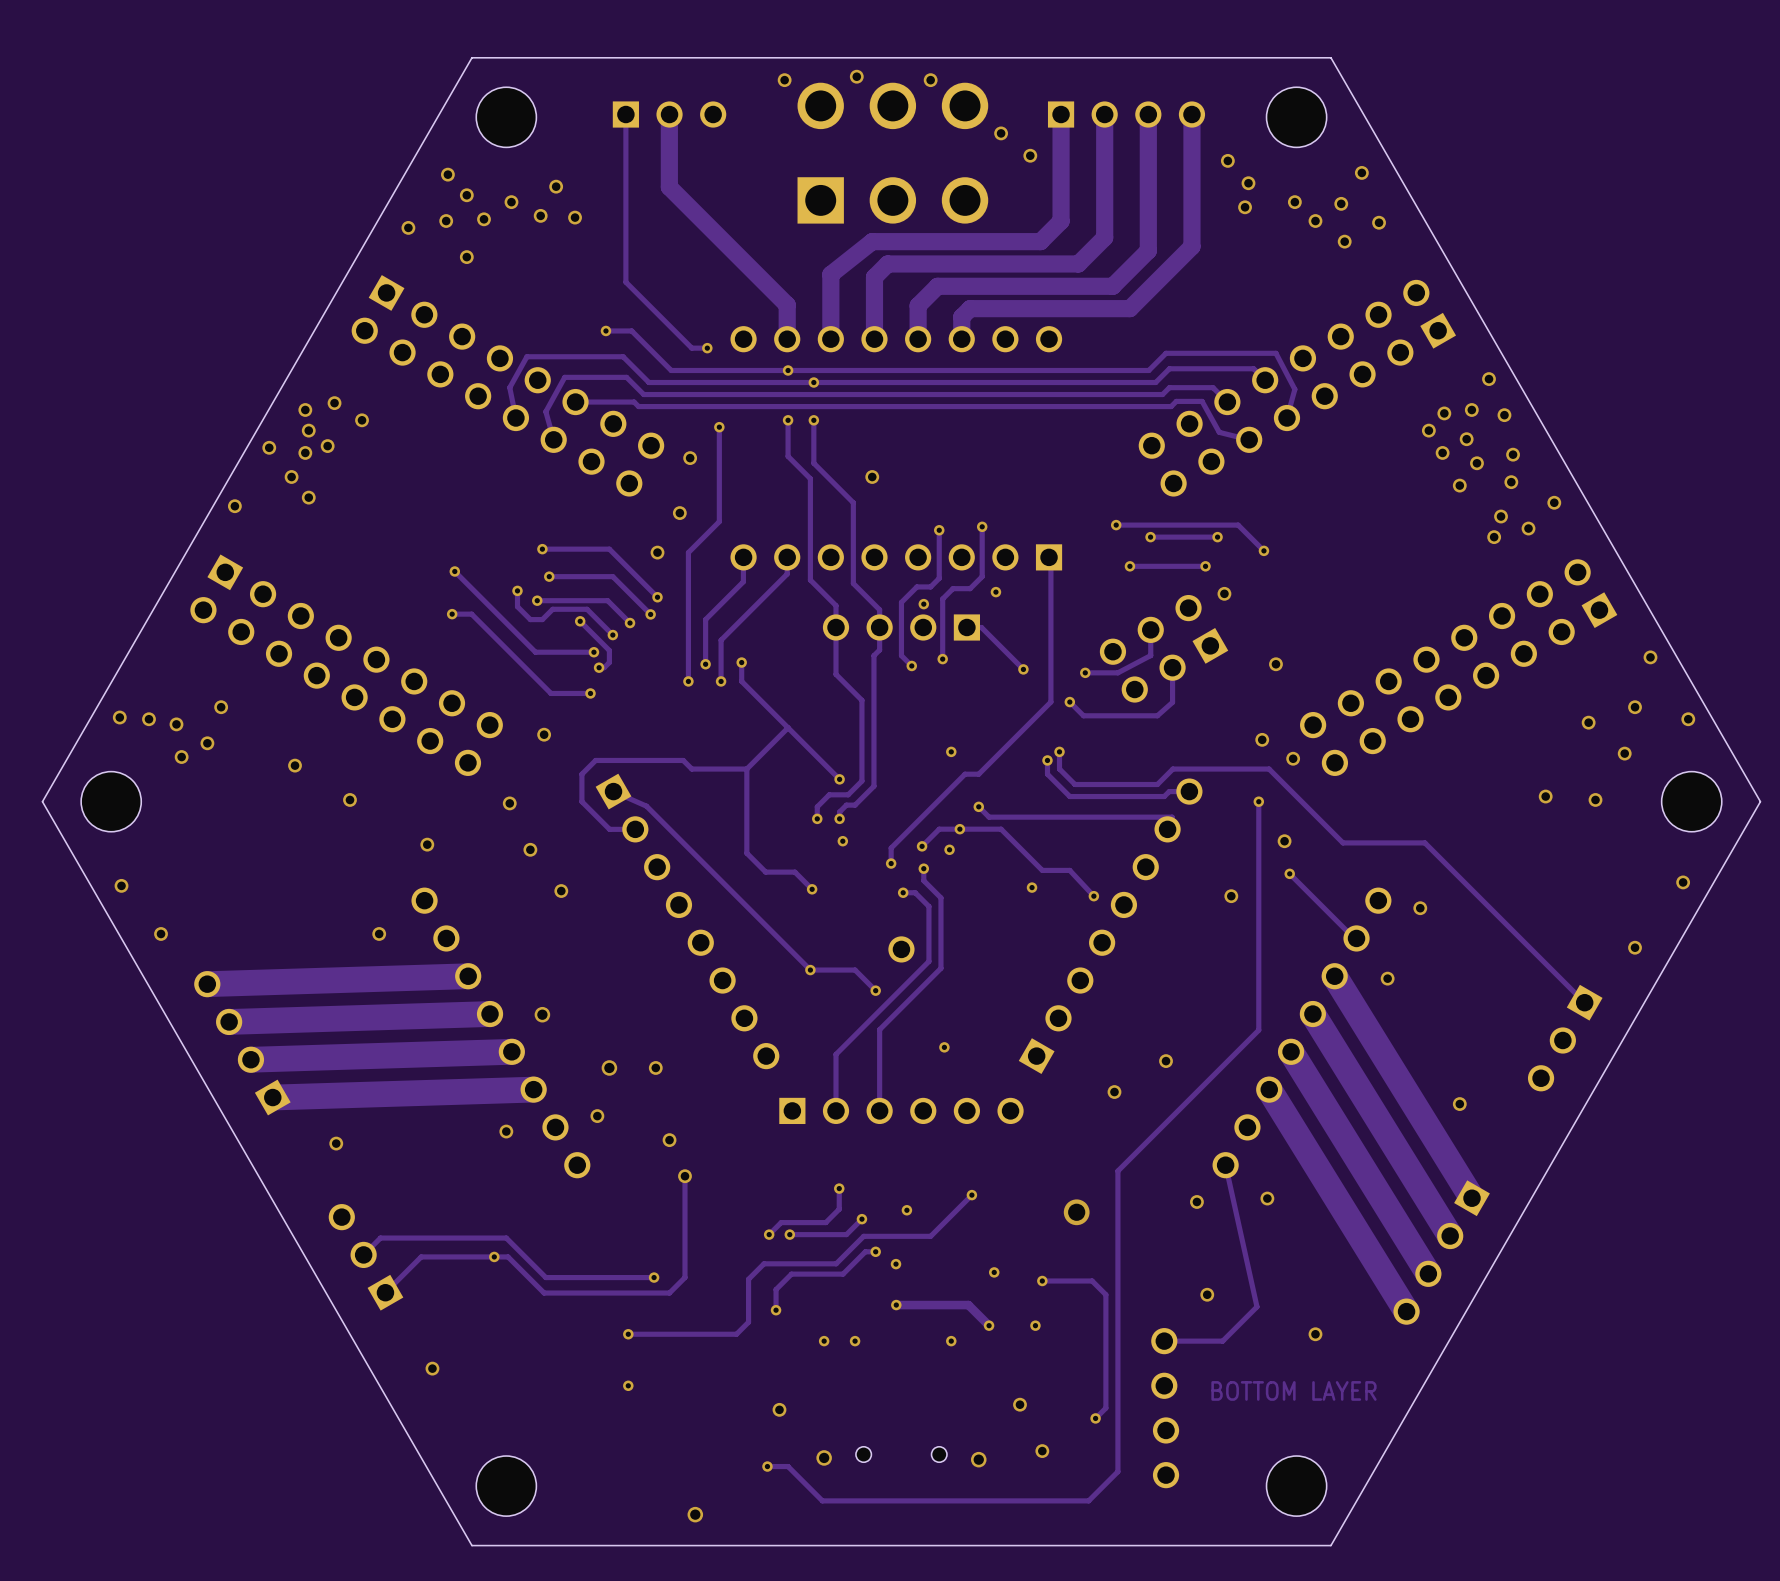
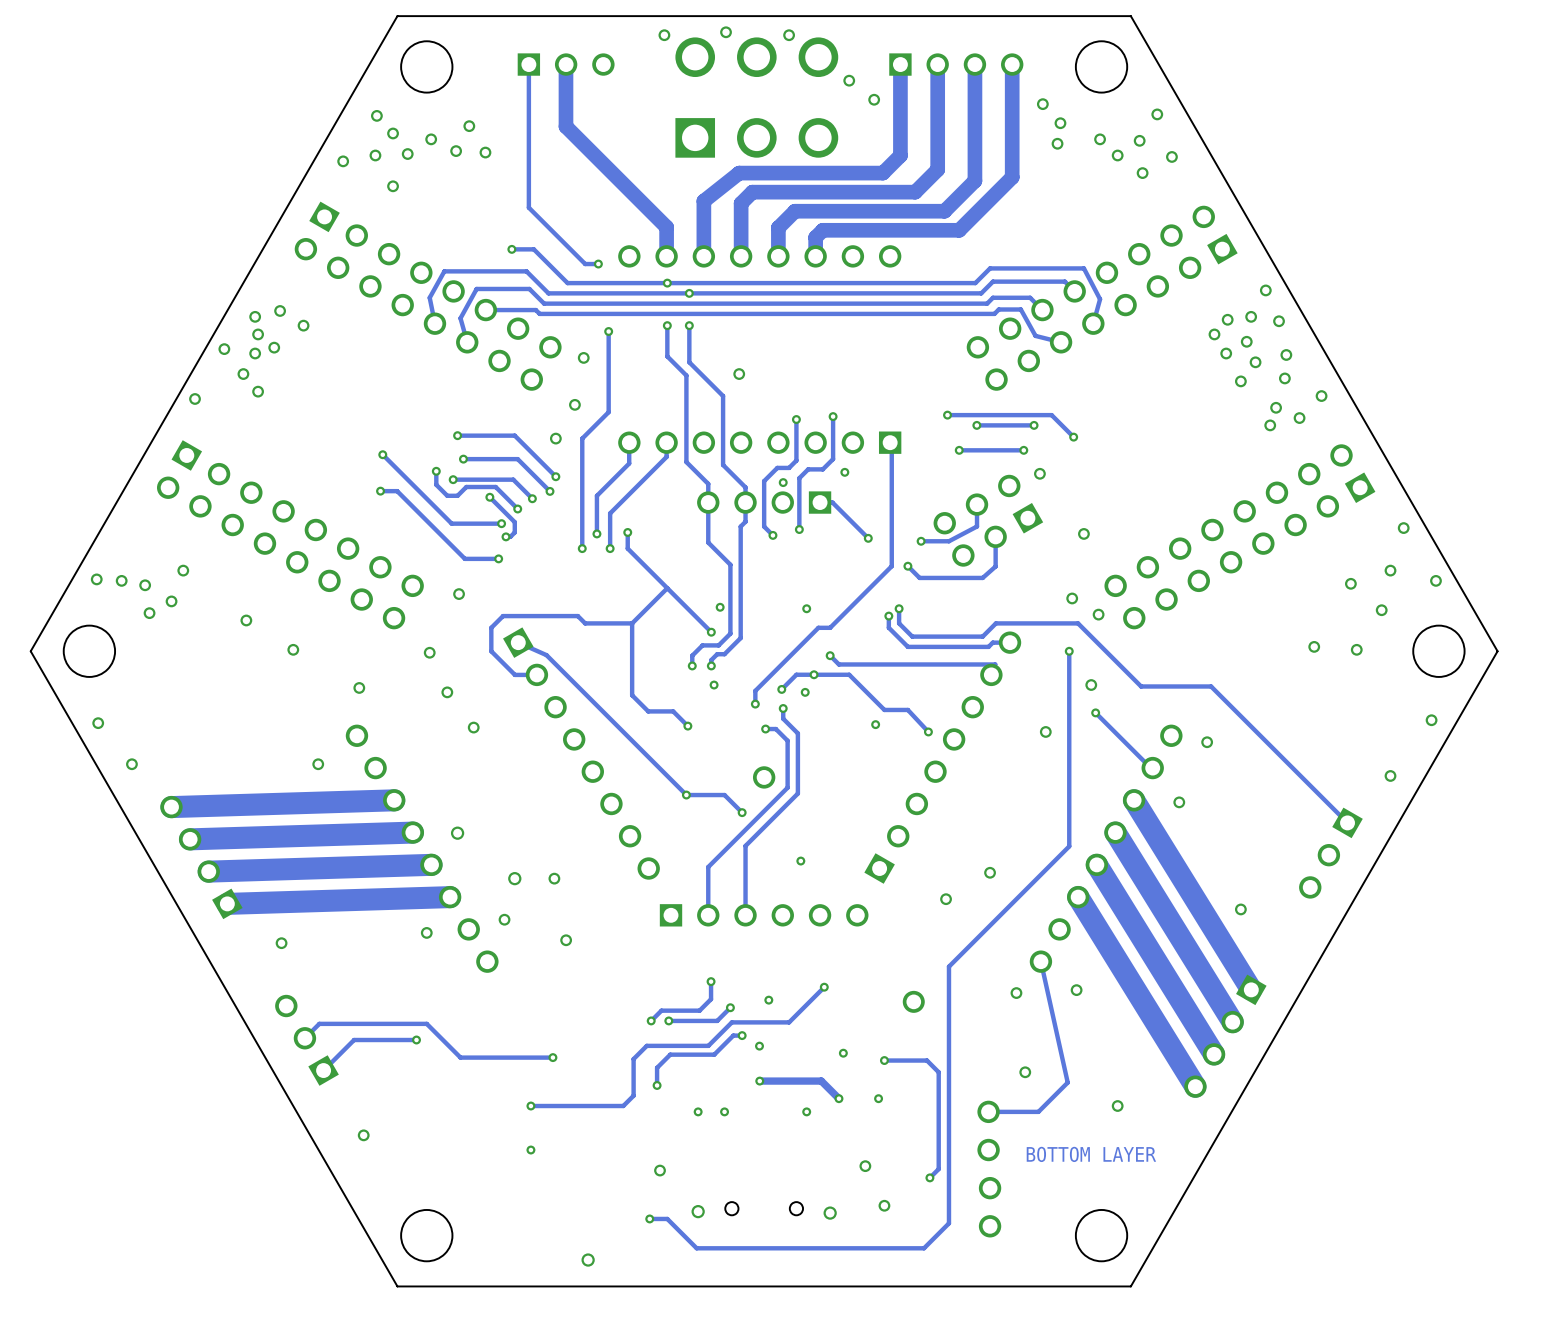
via: none -> (720, 607)
track: (684, 1176) (684, 1277) (669, 1293) (544, 1293) (508, 1256) (494, 1256) -> none
via: (684, 1176) -> none

